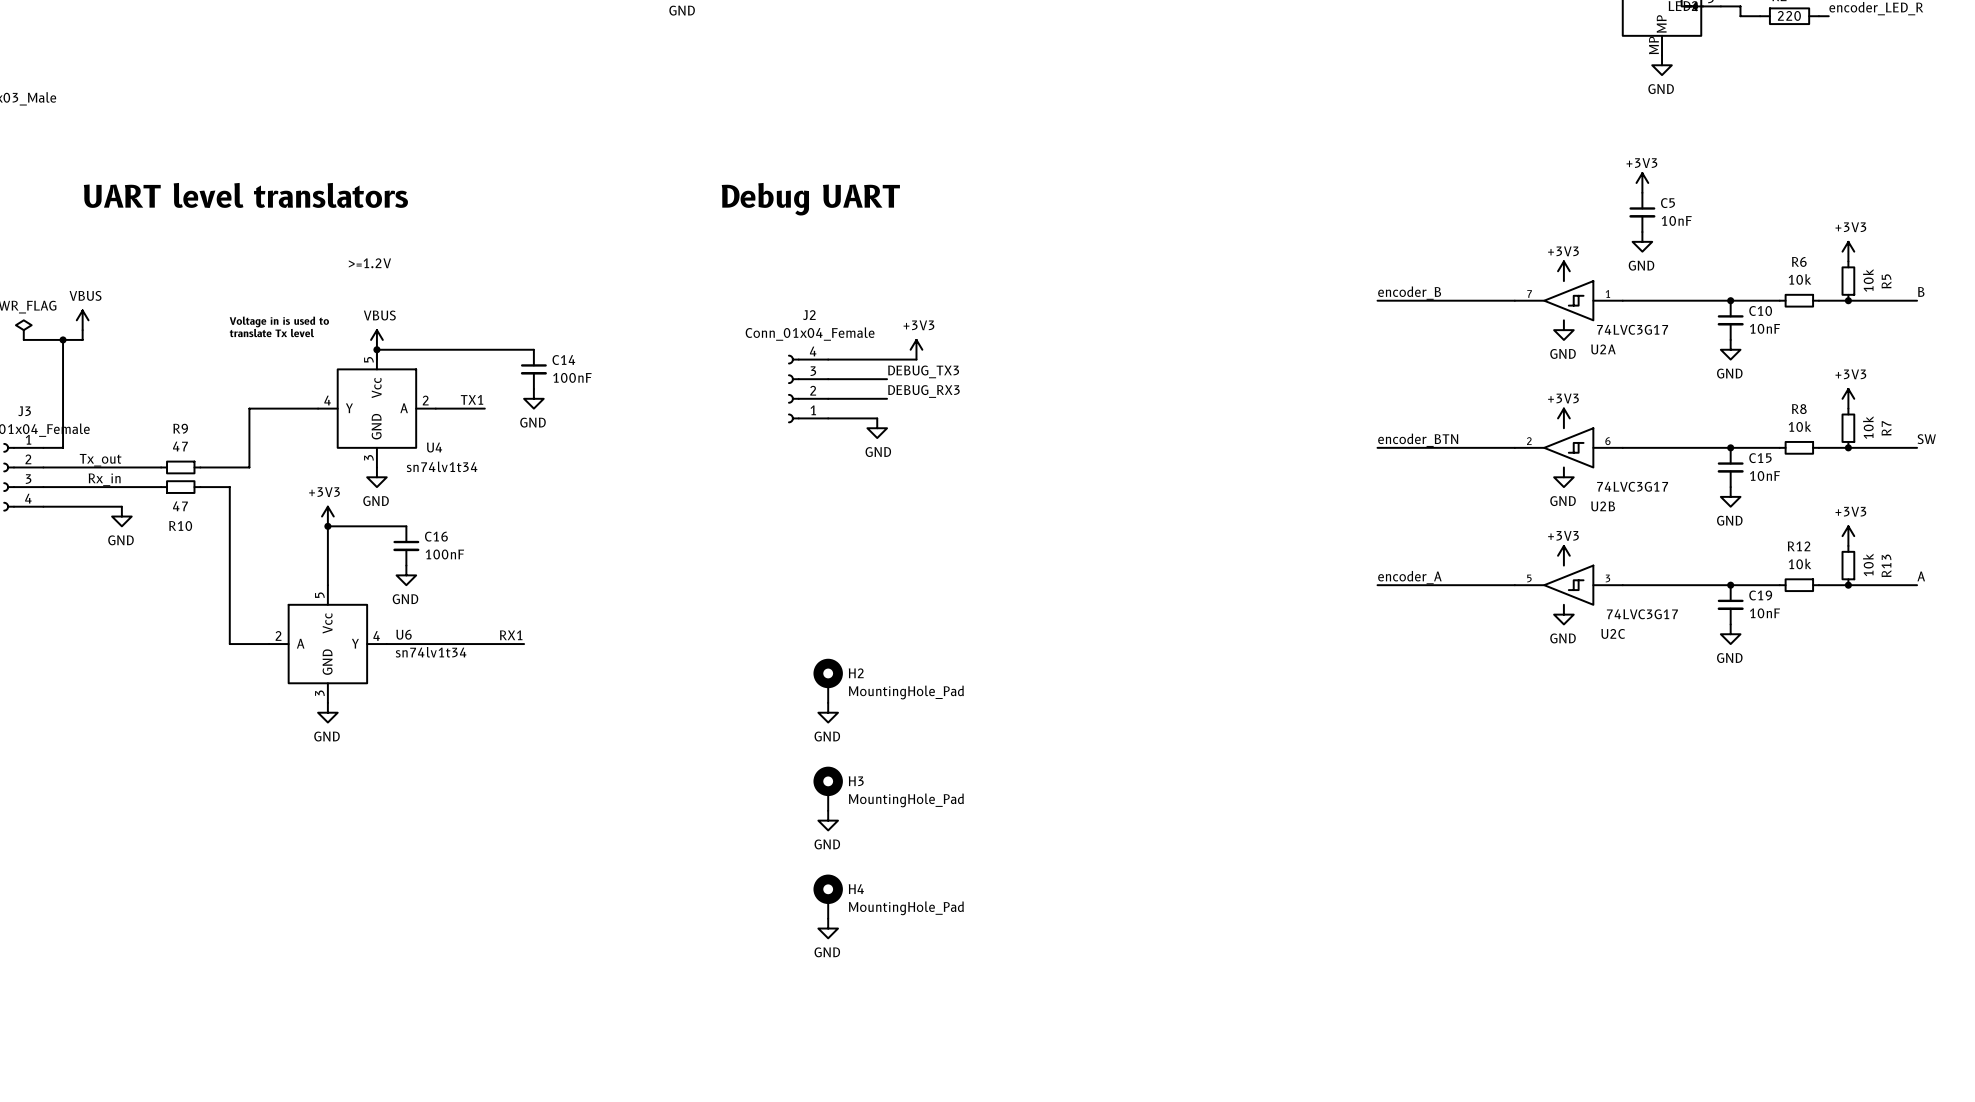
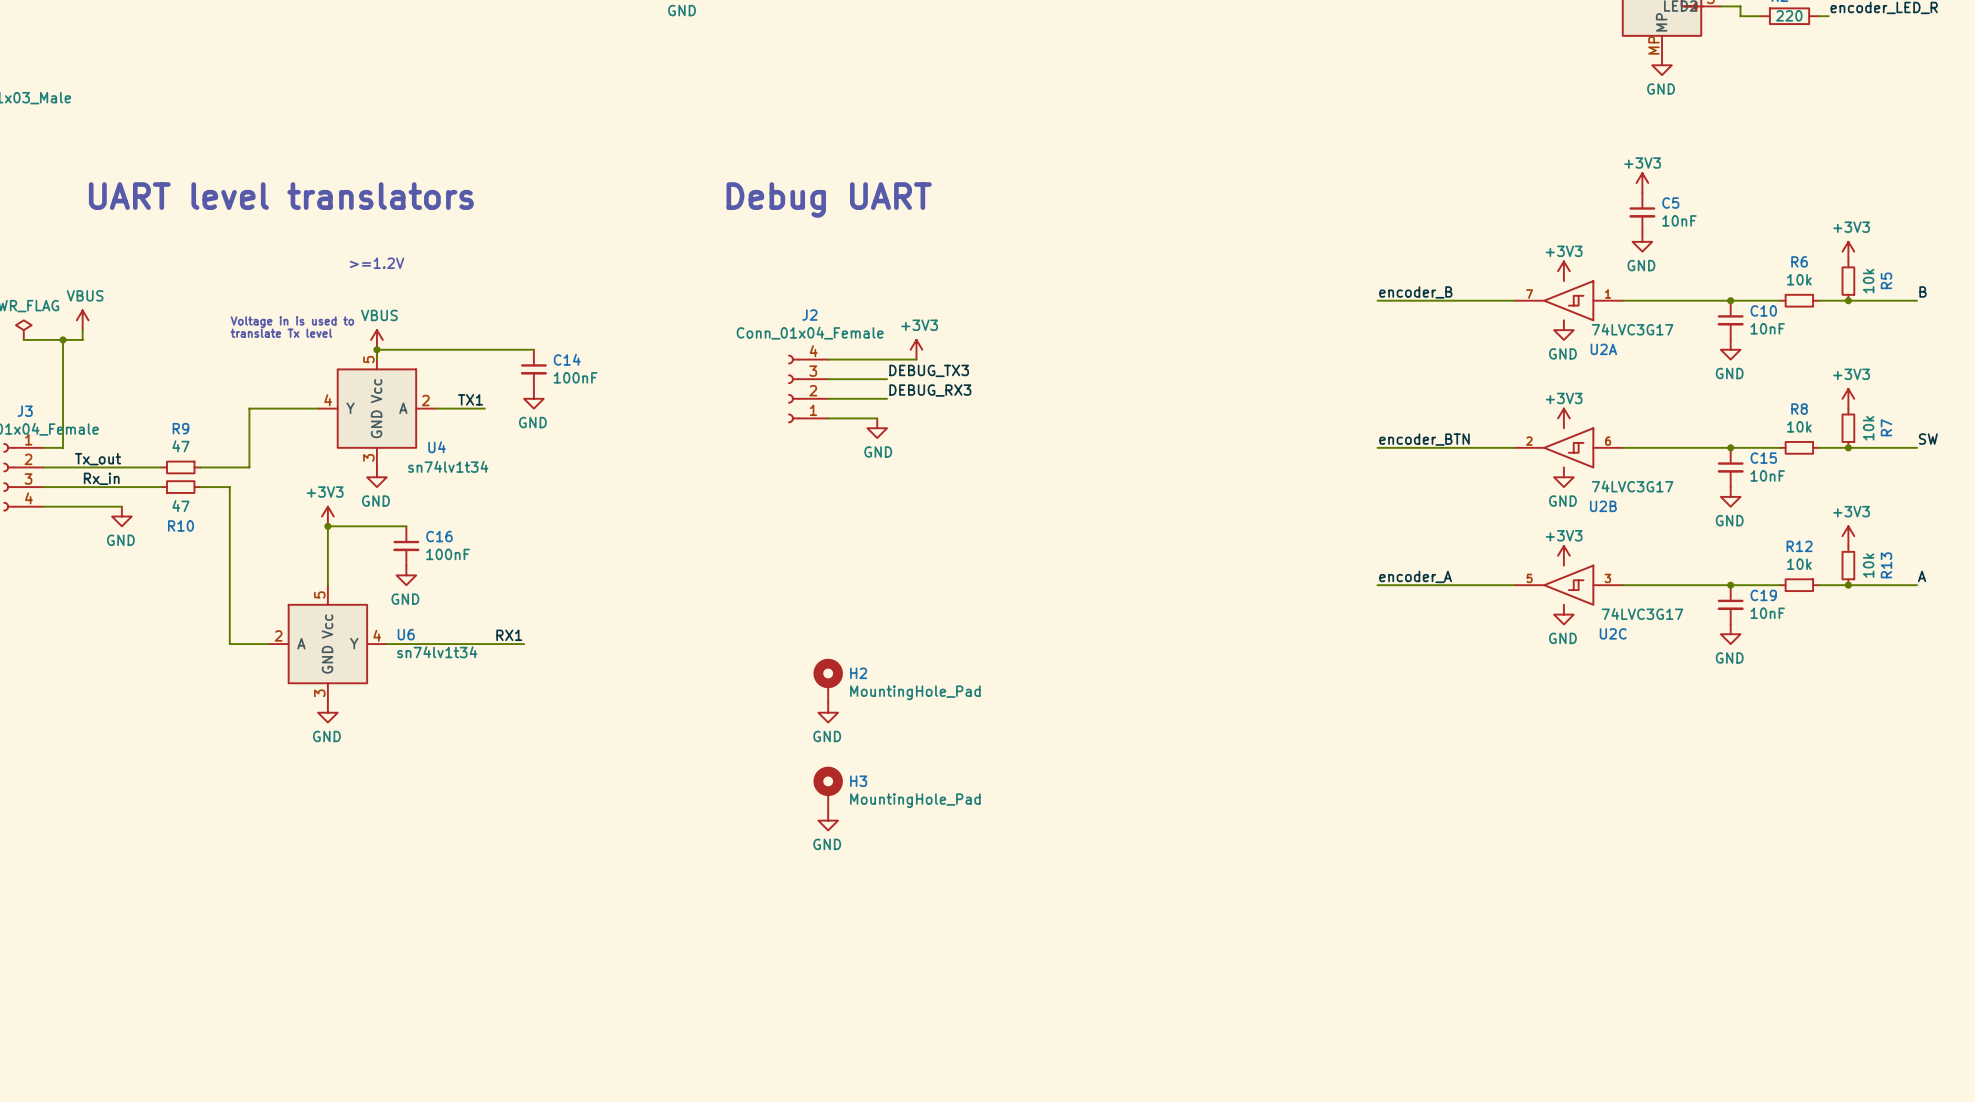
H4: MountingHole_Pad (828, 896) -> none
power symbol: GND (828, 928) -> none

